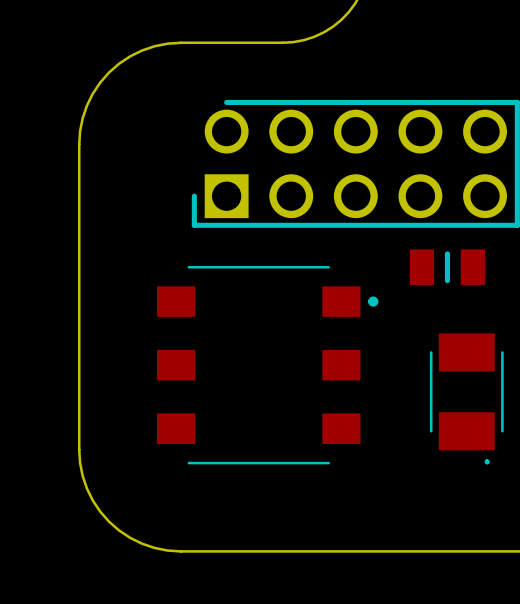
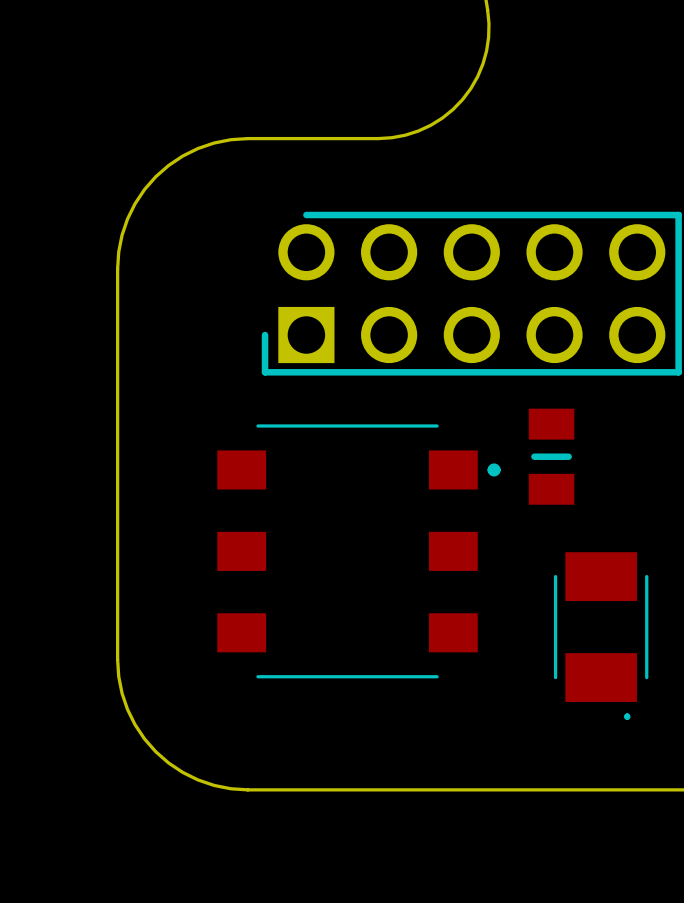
part rotation: 0° (447, 267) -> 90° clockwise (551, 456)
part position: (466, 398) -> (601, 636)

